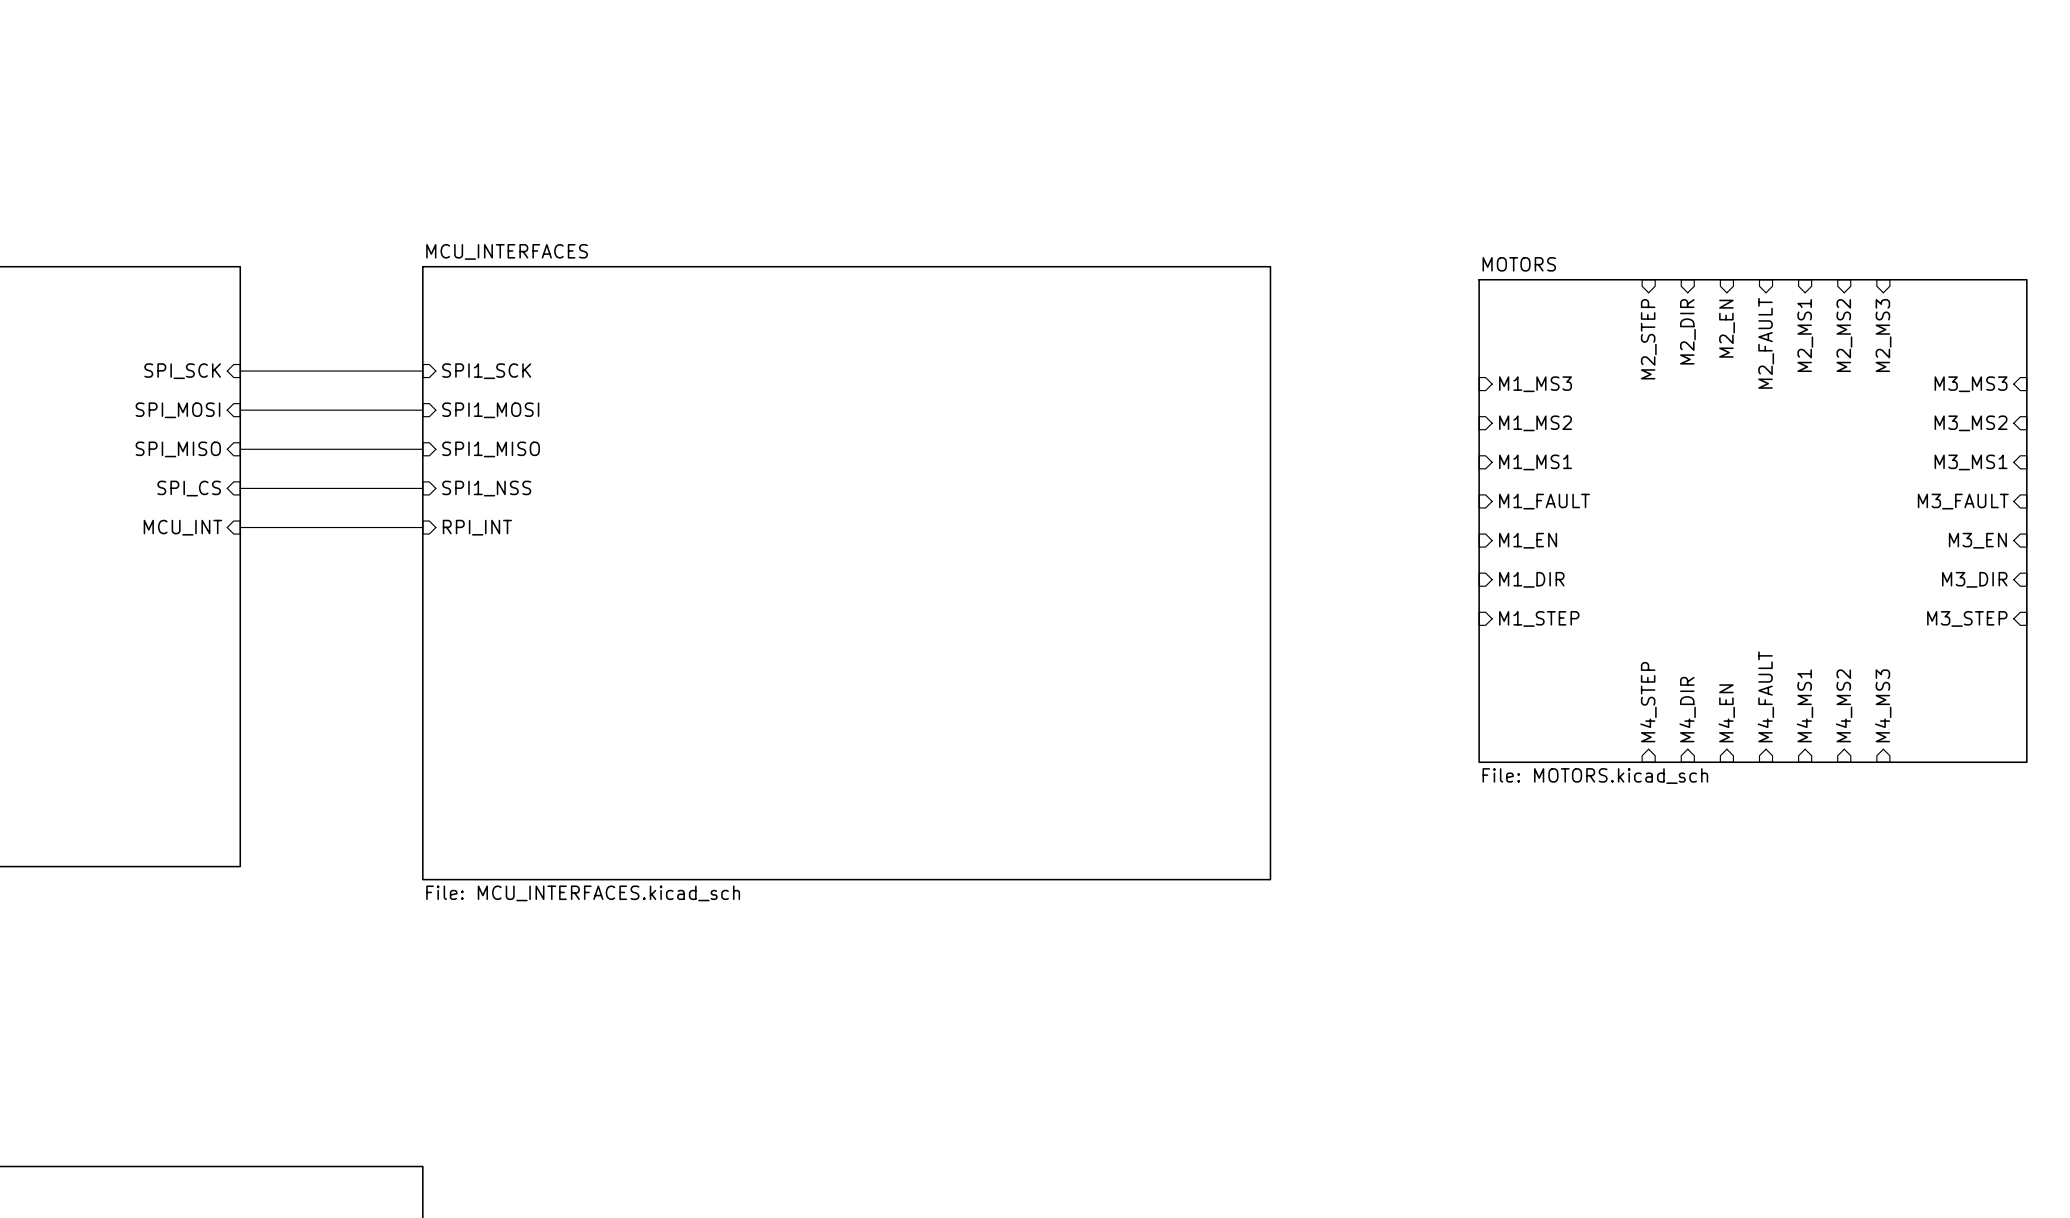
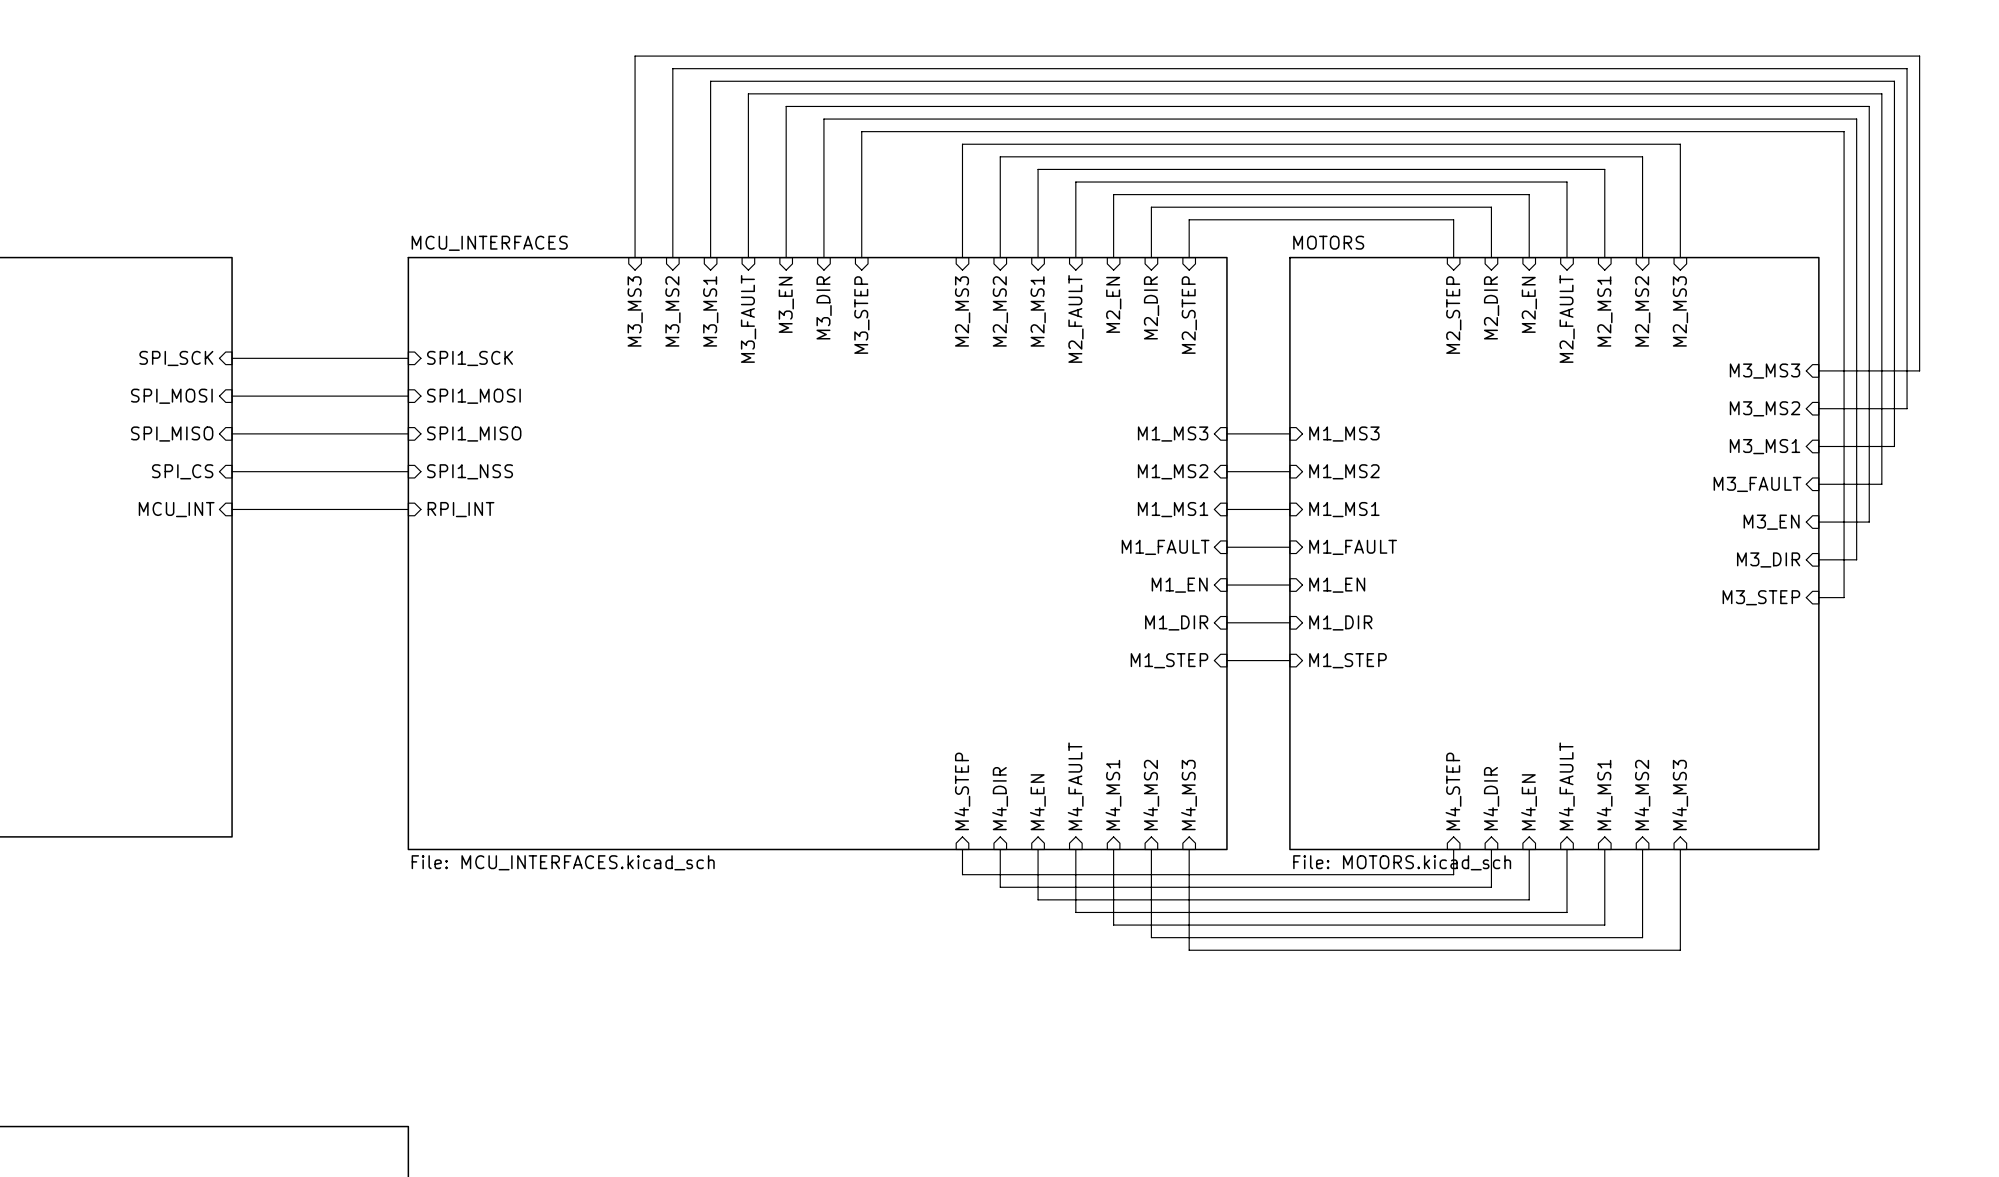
wire: none -> (635, 257) (635, 56) (1919, 56) (1919, 370) (1818, 370)
wire: none -> (672, 257) (672, 68) (1907, 68) (1907, 408) (1818, 408)
wire: none -> (710, 257) (710, 81) (1894, 81) (1894, 446) (1818, 446)
wire: none -> (748, 257) (748, 93) (1881, 93) (1881, 484) (1818, 484)
wire: none -> (786, 257) (786, 106) (1869, 106) (1869, 522) (1818, 522)
wire: none -> (823, 257) (823, 119) (1856, 119) (1856, 559) (1818, 559)
wire: none -> (861, 257) (861, 131) (1844, 131) (1844, 597) (1818, 597)
wire: none -> (962, 257) (962, 144) (1680, 144) (1680, 257)
wire: none -> (1000, 257) (1000, 156) (1642, 156) (1642, 257)
wire: none -> (1038, 257) (1038, 169) (1604, 169) (1604, 257)
wire: none -> (1075, 257) (1075, 182) (1566, 182) (1566, 257)
wire: none -> (1113, 257) (1113, 194) (1529, 194) (1529, 257)
wire: none -> (1151, 257) (1151, 207) (1491, 207) (1491, 257)
wire: none -> (1189, 257) (1189, 219) (1453, 219) (1453, 257)
sheet pin: none -> M3_EN (786, 304)
sheet pin: none -> M2_EN (1113, 304)
sheet pin: none -> M3_DIR (824, 307)
sheet pin: none -> M2_DIR (1151, 307)
sheet pin: none -> M3_MS3 (635, 311)
sheet pin: none -> M3_MS2 (672, 311)
sheet pin: none -> M3_MS1 (710, 311)
sheet pin: none -> M2_MS3 (962, 311)
sheet pin: none -> M2_MS2 (1000, 311)
sheet pin: none -> M2_MS1 (1038, 311)
sheet pin: none -> M3_STEP (861, 315)
sheet pin: none -> M2_STEP (1189, 315)
sheet pin position: M2_EN (1727, 328) -> M2_EN (1529, 304)
sheet pin: none -> M3_FAULT (748, 318)
sheet pin: none -> M2_FAULT (1075, 318)
sheet pin position: M2_DIR (1687, 331) -> M2_DIR (1491, 307)
sheet pin position: M2_MS1 (1805, 335) -> M2_MS1 (1604, 311)
sheet pin position: M2_MS2 (1844, 335) -> M2_MS2 (1642, 311)
sheet pin position: M2_MS3 (1883, 335) -> M2_MS3 (1680, 311)
sheet pin position: M2_STEP (1648, 339) -> M2_STEP (1453, 315)
sheet pin position: M2_FAULT (1766, 343) -> M2_FAULT (1567, 318)
sheet pin: M1_MS3 (1535, 384) -> none
sheet pin position: M3_MS3 (1971, 384) -> M3_MS3 (1765, 371)
sheet pin: M1_MS2 (1535, 423) -> none
sheet pin position: M3_MS2 (1971, 423) -> M3_MS2 (1765, 408)
sheet pin: none -> M1_MS3 (1173, 434)
wire: none -> (1226, 433) (1289, 433)
sheet pin: none -> M1_MS3 (1344, 434)
sheet pin: M1_MS1 (1535, 462) -> none
sheet pin position: M3_MS1 (1971, 462) -> M3_MS1 (1765, 446)
sheet pin: none -> M1_MS2 (1173, 471)
wire: none -> (1226, 471) (1289, 471)
sheet pin: none -> M1_MS2 (1344, 471)
sheet pin: M1_FAULT (1544, 501) -> none
sheet pin position: M3_FAULT (1963, 501) -> M3_FAULT (1757, 484)
sheet MOTORS: File: MOTORS.kicad_sch (1752, 521) -> none
sheet pin: none -> M1_MS1 (1173, 509)
wire: none -> (1226, 509) (1289, 509)
sheet pin: none -> M1_MS1 (1344, 509)
sheet pin: M1_EN (1528, 540) -> none
sheet pin position: M3_EN (1977, 540) -> M3_EN (1771, 522)
sheet pin: none -> M1_FAULT (1165, 547)
wire: none -> (1226, 547) (1289, 547)
sheet pin: none -> M1_FAULT (1353, 547)
sheet MOTORS: none -> File: MOTORS.kicad_sch (1554, 553)
sheet pin: M1_DIR (1531, 579) -> none
sheet pin position: M3_DIR (1974, 579) -> M3_DIR (1768, 559)
sheet pin: none -> M1_EN (1179, 585)
wire: none -> (1226, 585) (1289, 585)
sheet pin: none -> M1_EN (1337, 585)
sheet pin: M1_STEP (1539, 618) -> none
sheet pin position: M3_STEP (1967, 618) -> M3_STEP (1761, 597)
wire: none -> (1226, 622) (1289, 622)
sheet pin: none -> M1_DIR (1176, 622)
sheet pin: none -> M1_DIR (1340, 622)
sheet pin: none -> M1_STEP (1169, 660)
wire: none -> (1226, 660) (1289, 660)
sheet pin: none -> M1_STEP (1348, 660)
sheet pin position: M4_FAULT (1765, 696) -> M4_FAULT (1566, 786)
sheet pin position: M4_STEP (1648, 702) -> M4_STEP (1453, 791)
sheet pin position: M4_MS1 (1804, 705) -> M4_MS1 (1604, 795)
sheet pin position: M4_MS2 (1844, 705) -> M4_MS2 (1642, 795)
sheet pin position: M4_MS3 (1883, 705) -> M4_MS3 (1680, 795)
sheet pin position: M4_DIR (1687, 709) -> M4_DIR (1491, 798)
sheet pin position: M4_EN (1726, 713) -> M4_EN (1529, 802)
sheet pin: none -> M4_FAULT (1075, 786)
sheet pin: none -> M4_STEP (962, 791)
sheet pin: none -> M4_MS1 (1113, 795)
sheet pin: none -> M4_MS2 (1151, 795)
sheet pin: none -> M4_MS3 (1189, 795)
sheet pin: none -> M4_DIR (1000, 798)
sheet pin: none -> M4_EN (1037, 802)
wire: none -> (962, 849) (962, 874) (1453, 874) (1453, 849)
wire: none -> (1000, 849) (1000, 887) (1491, 887) (1491, 849)
wire: none -> (1038, 849) (1038, 899) (1529, 899) (1529, 849)
wire: none -> (1075, 849) (1075, 912) (1566, 912) (1566, 849)
wire: none -> (1113, 849) (1113, 925) (1604, 925) (1604, 849)
wire: none -> (1151, 849) (1151, 937) (1642, 937) (1642, 849)
wire: none -> (1189, 849) (1189, 950) (1680, 950) (1680, 849)

